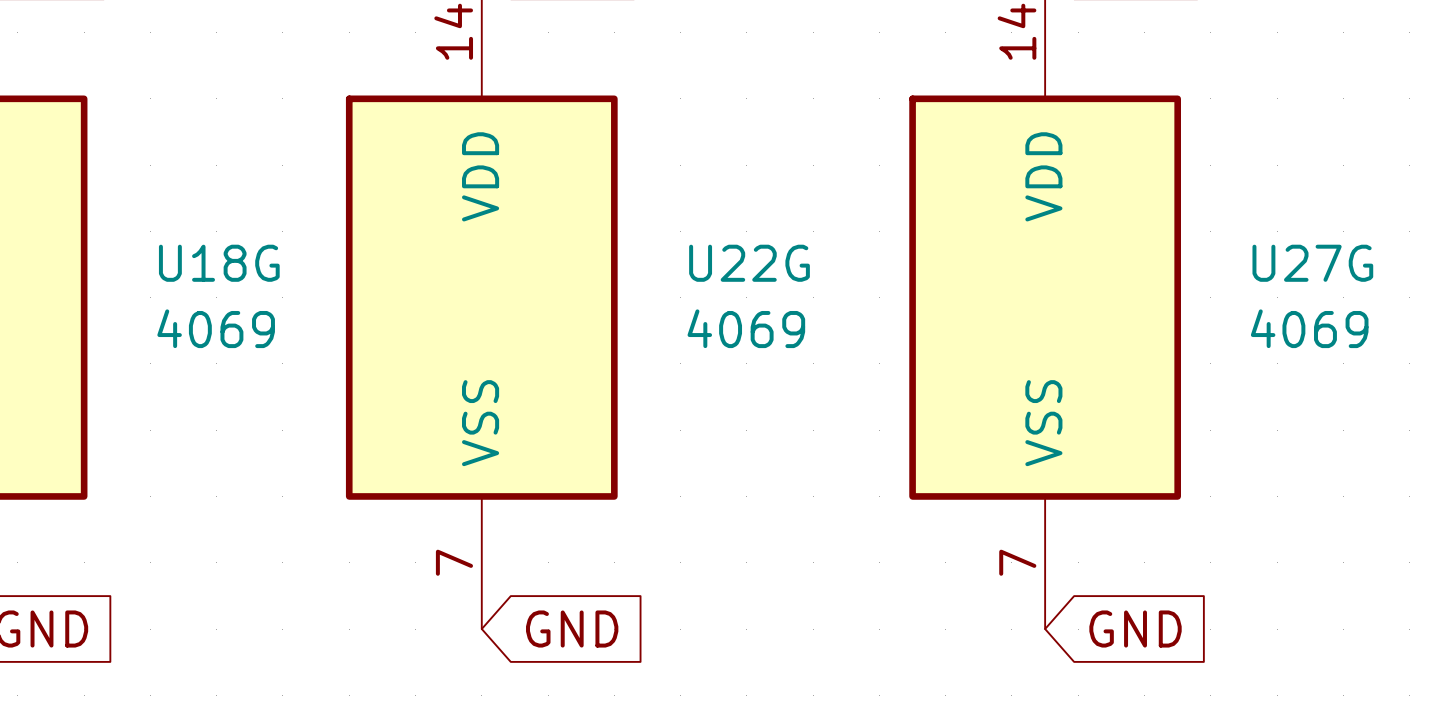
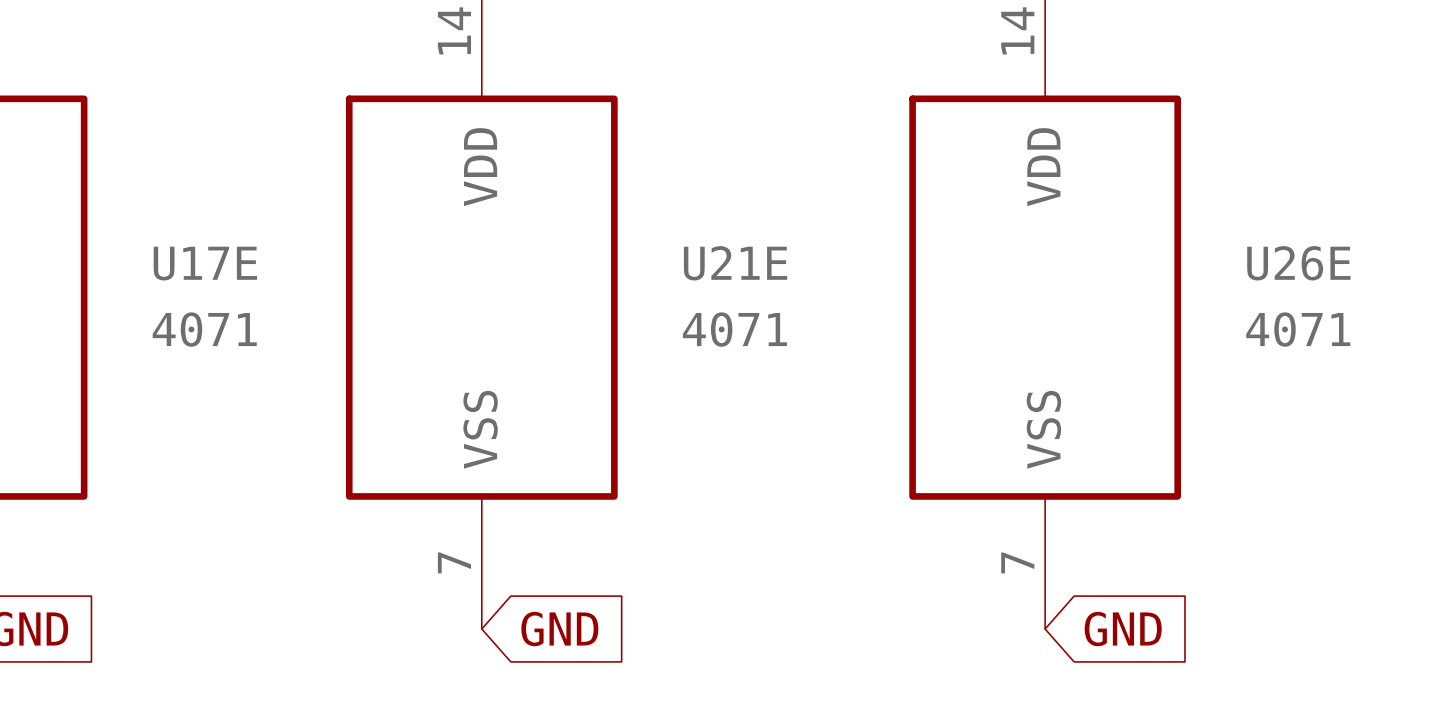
U18G name: U18G (219, 263) -> U17E (205, 263)
U22G name: U22G (749, 263) -> U21E (735, 263)
U27G name: U27G (1312, 263) -> U26E (1298, 263)
U18G value: 4069 (216, 328) -> 4071 (204, 329)
U22G value: 4069 (746, 328) -> 4071 (734, 329)
U27G value: 4069 (1309, 328) -> 4071 (1298, 329)

